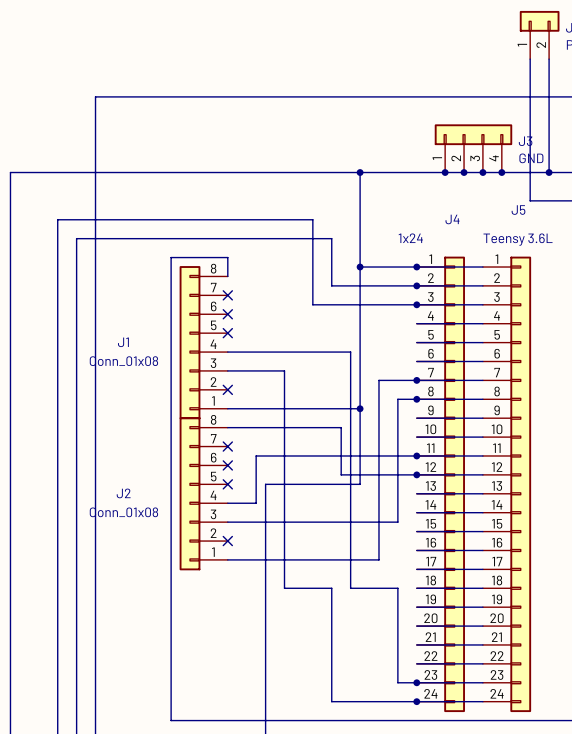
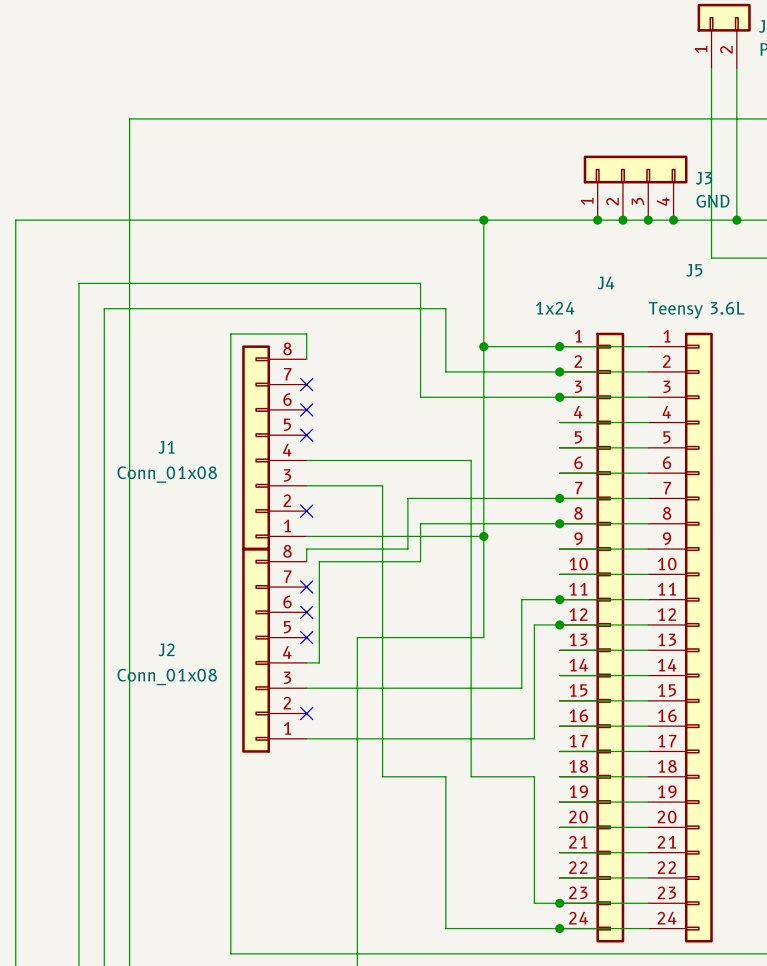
wire: (378, 380) (378, 559) -> (509, 498) (407, 498) (407, 549) (306, 549) (306, 561)
wire: (397, 399) (397, 474) (341, 474) (341, 427) (312, 427) -> (534, 523) (420, 523) (420, 561)
wire: (227, 427) (237, 427) -> (319, 662) (319, 561)
wire: (388, 455) (256, 455) (256, 503) (237, 503) -> (521, 599) (521, 688)
wire: (388, 522) (397, 522) -> (509, 738) (534, 738) (534, 688)

